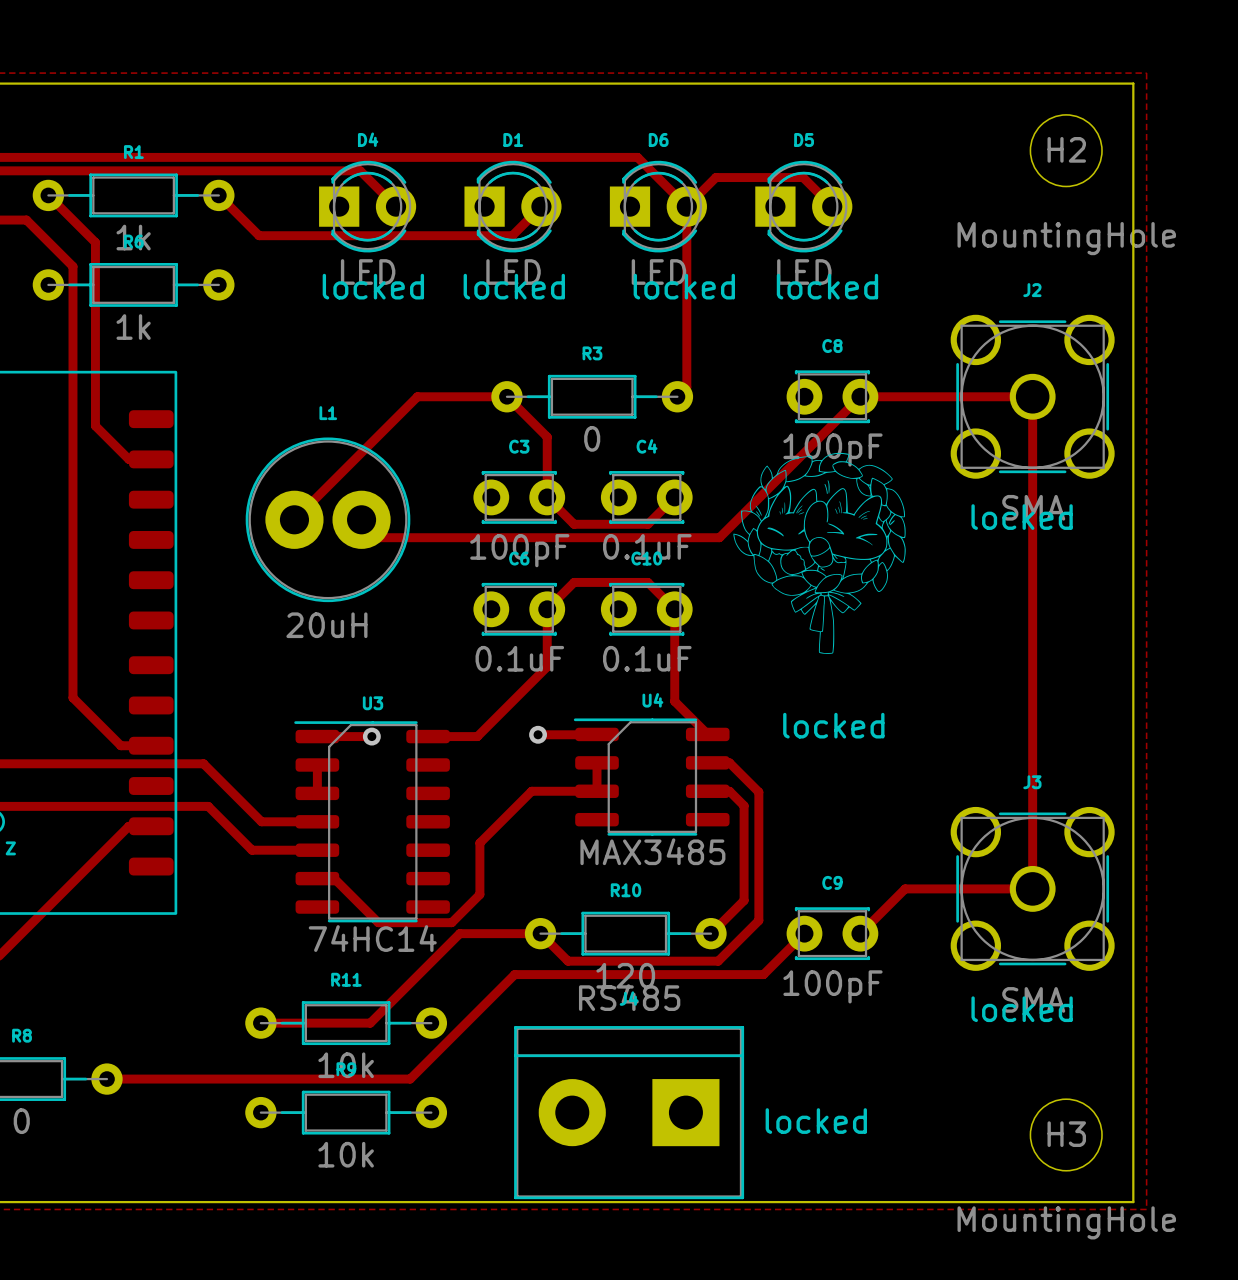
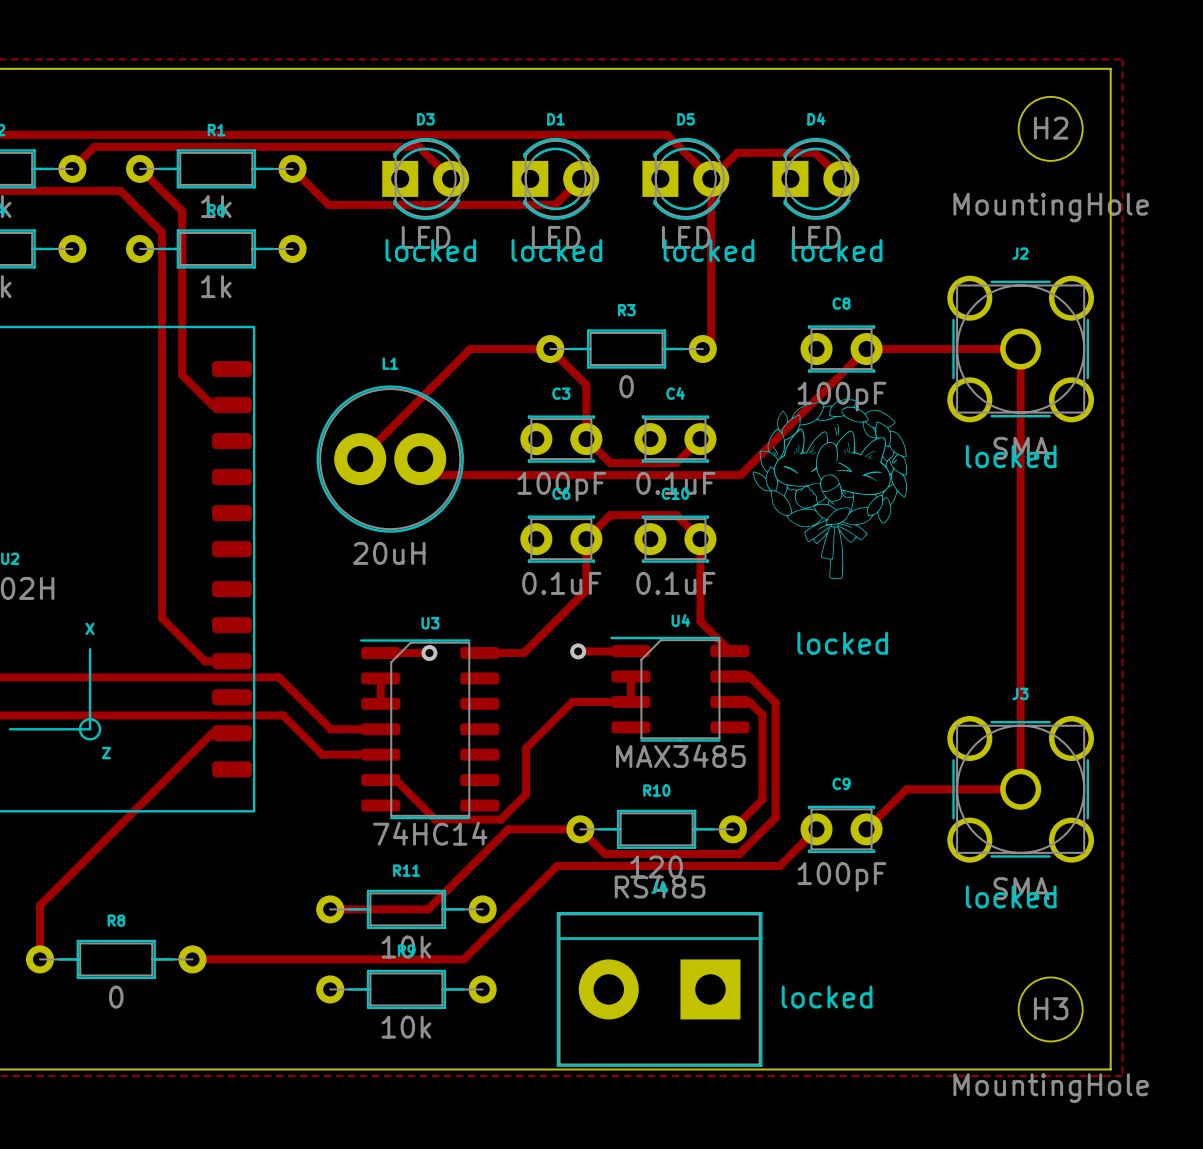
D4 name: D4 (368, 139) -> D3 (425, 119)
D6 name: D6 (658, 139) -> D5 (686, 119)
D5 name: D5 (804, 139) -> D4 (816, 119)

